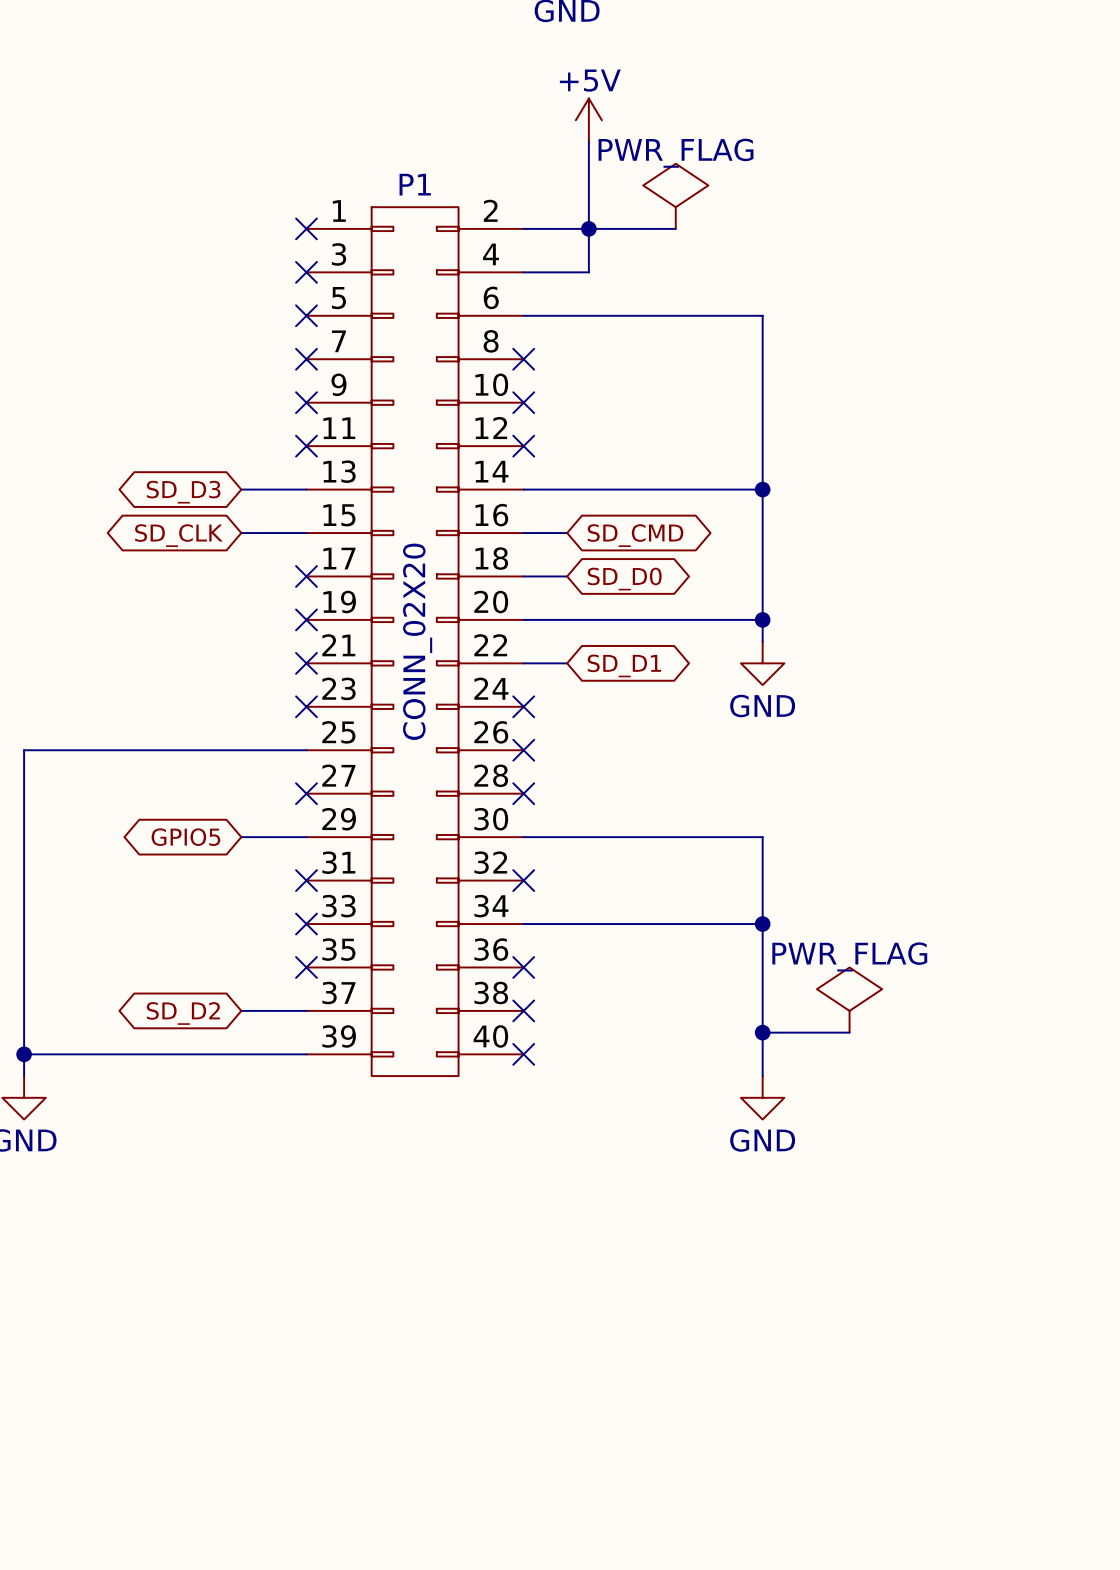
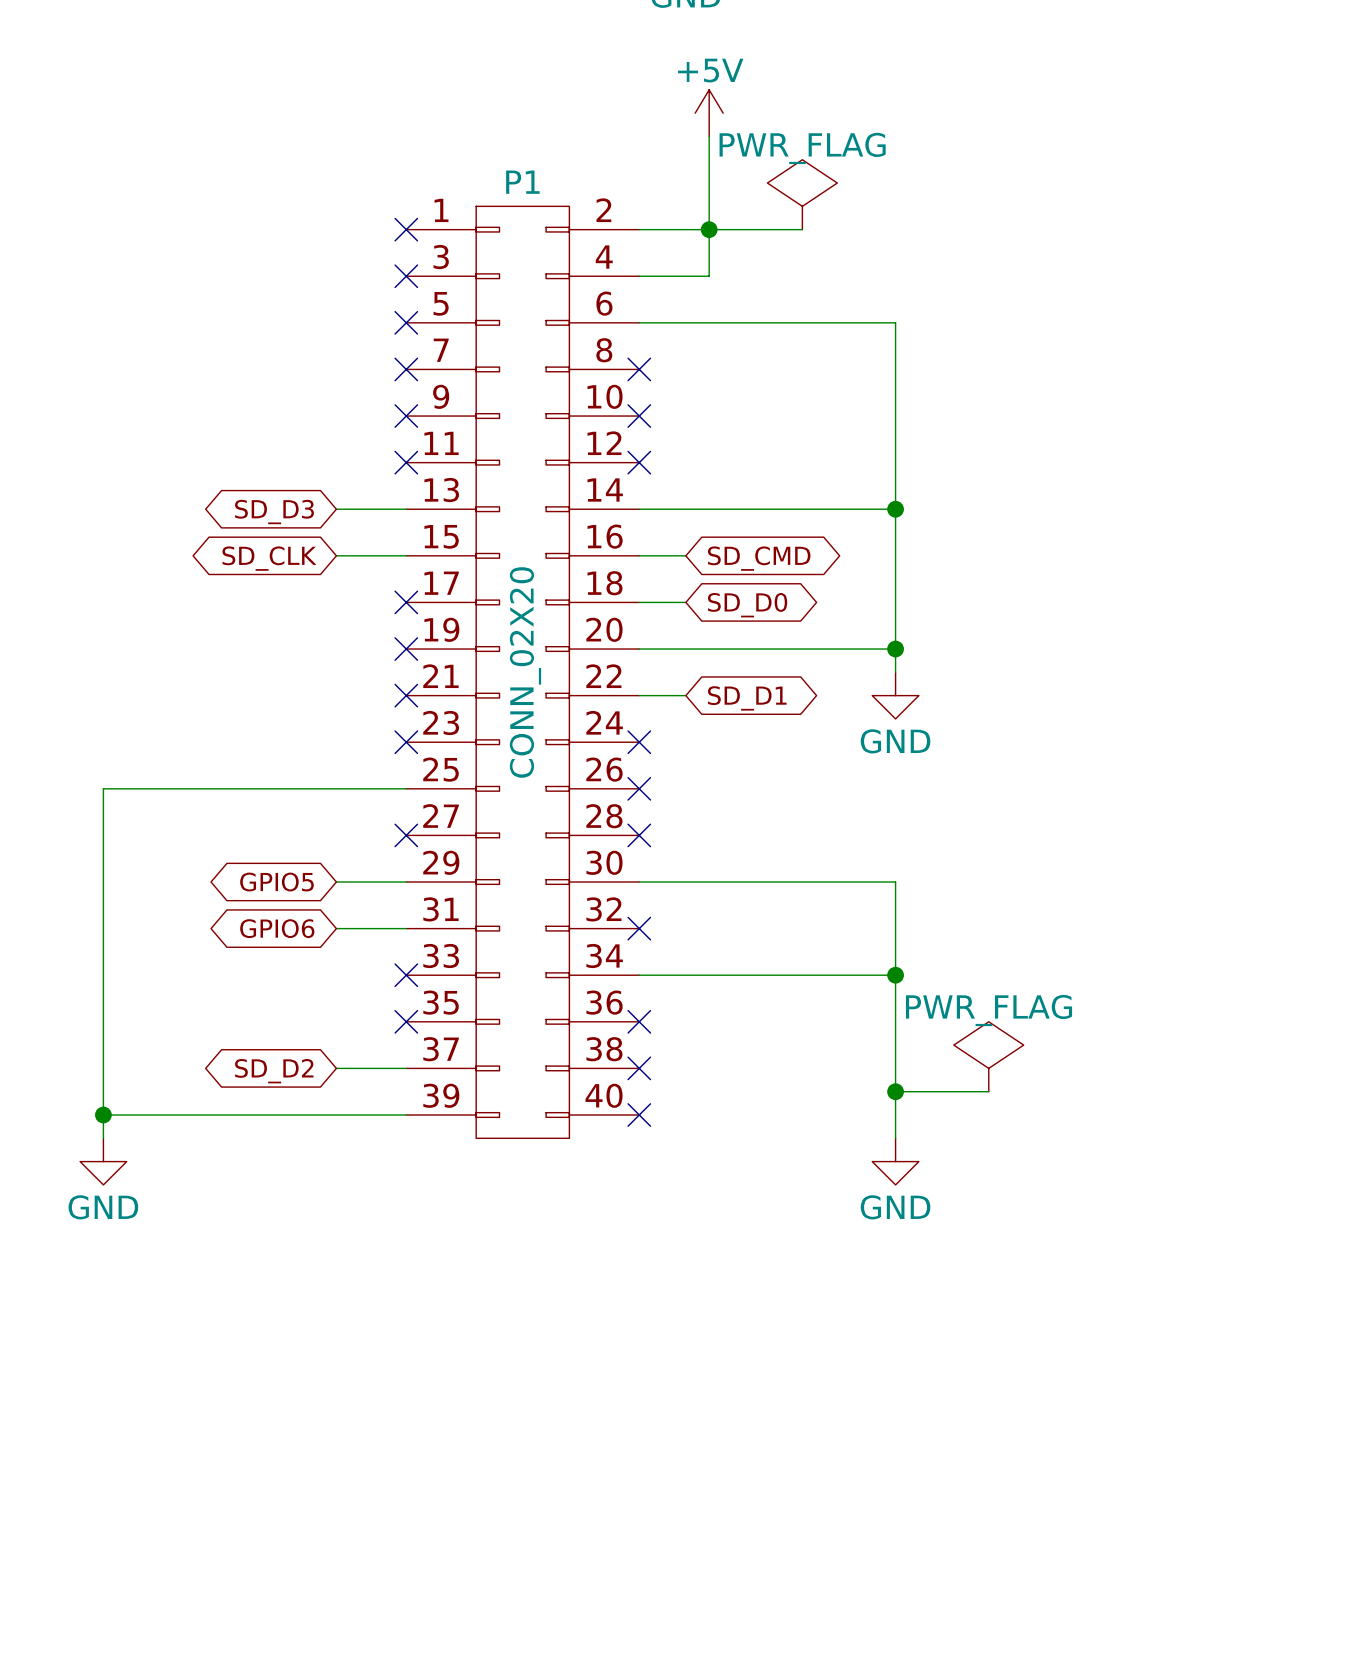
global label: none -> GPIO6 (277, 928)
wire: none -> (336, 928) (406, 928)
no-connect mark: (306, 880) -> none

